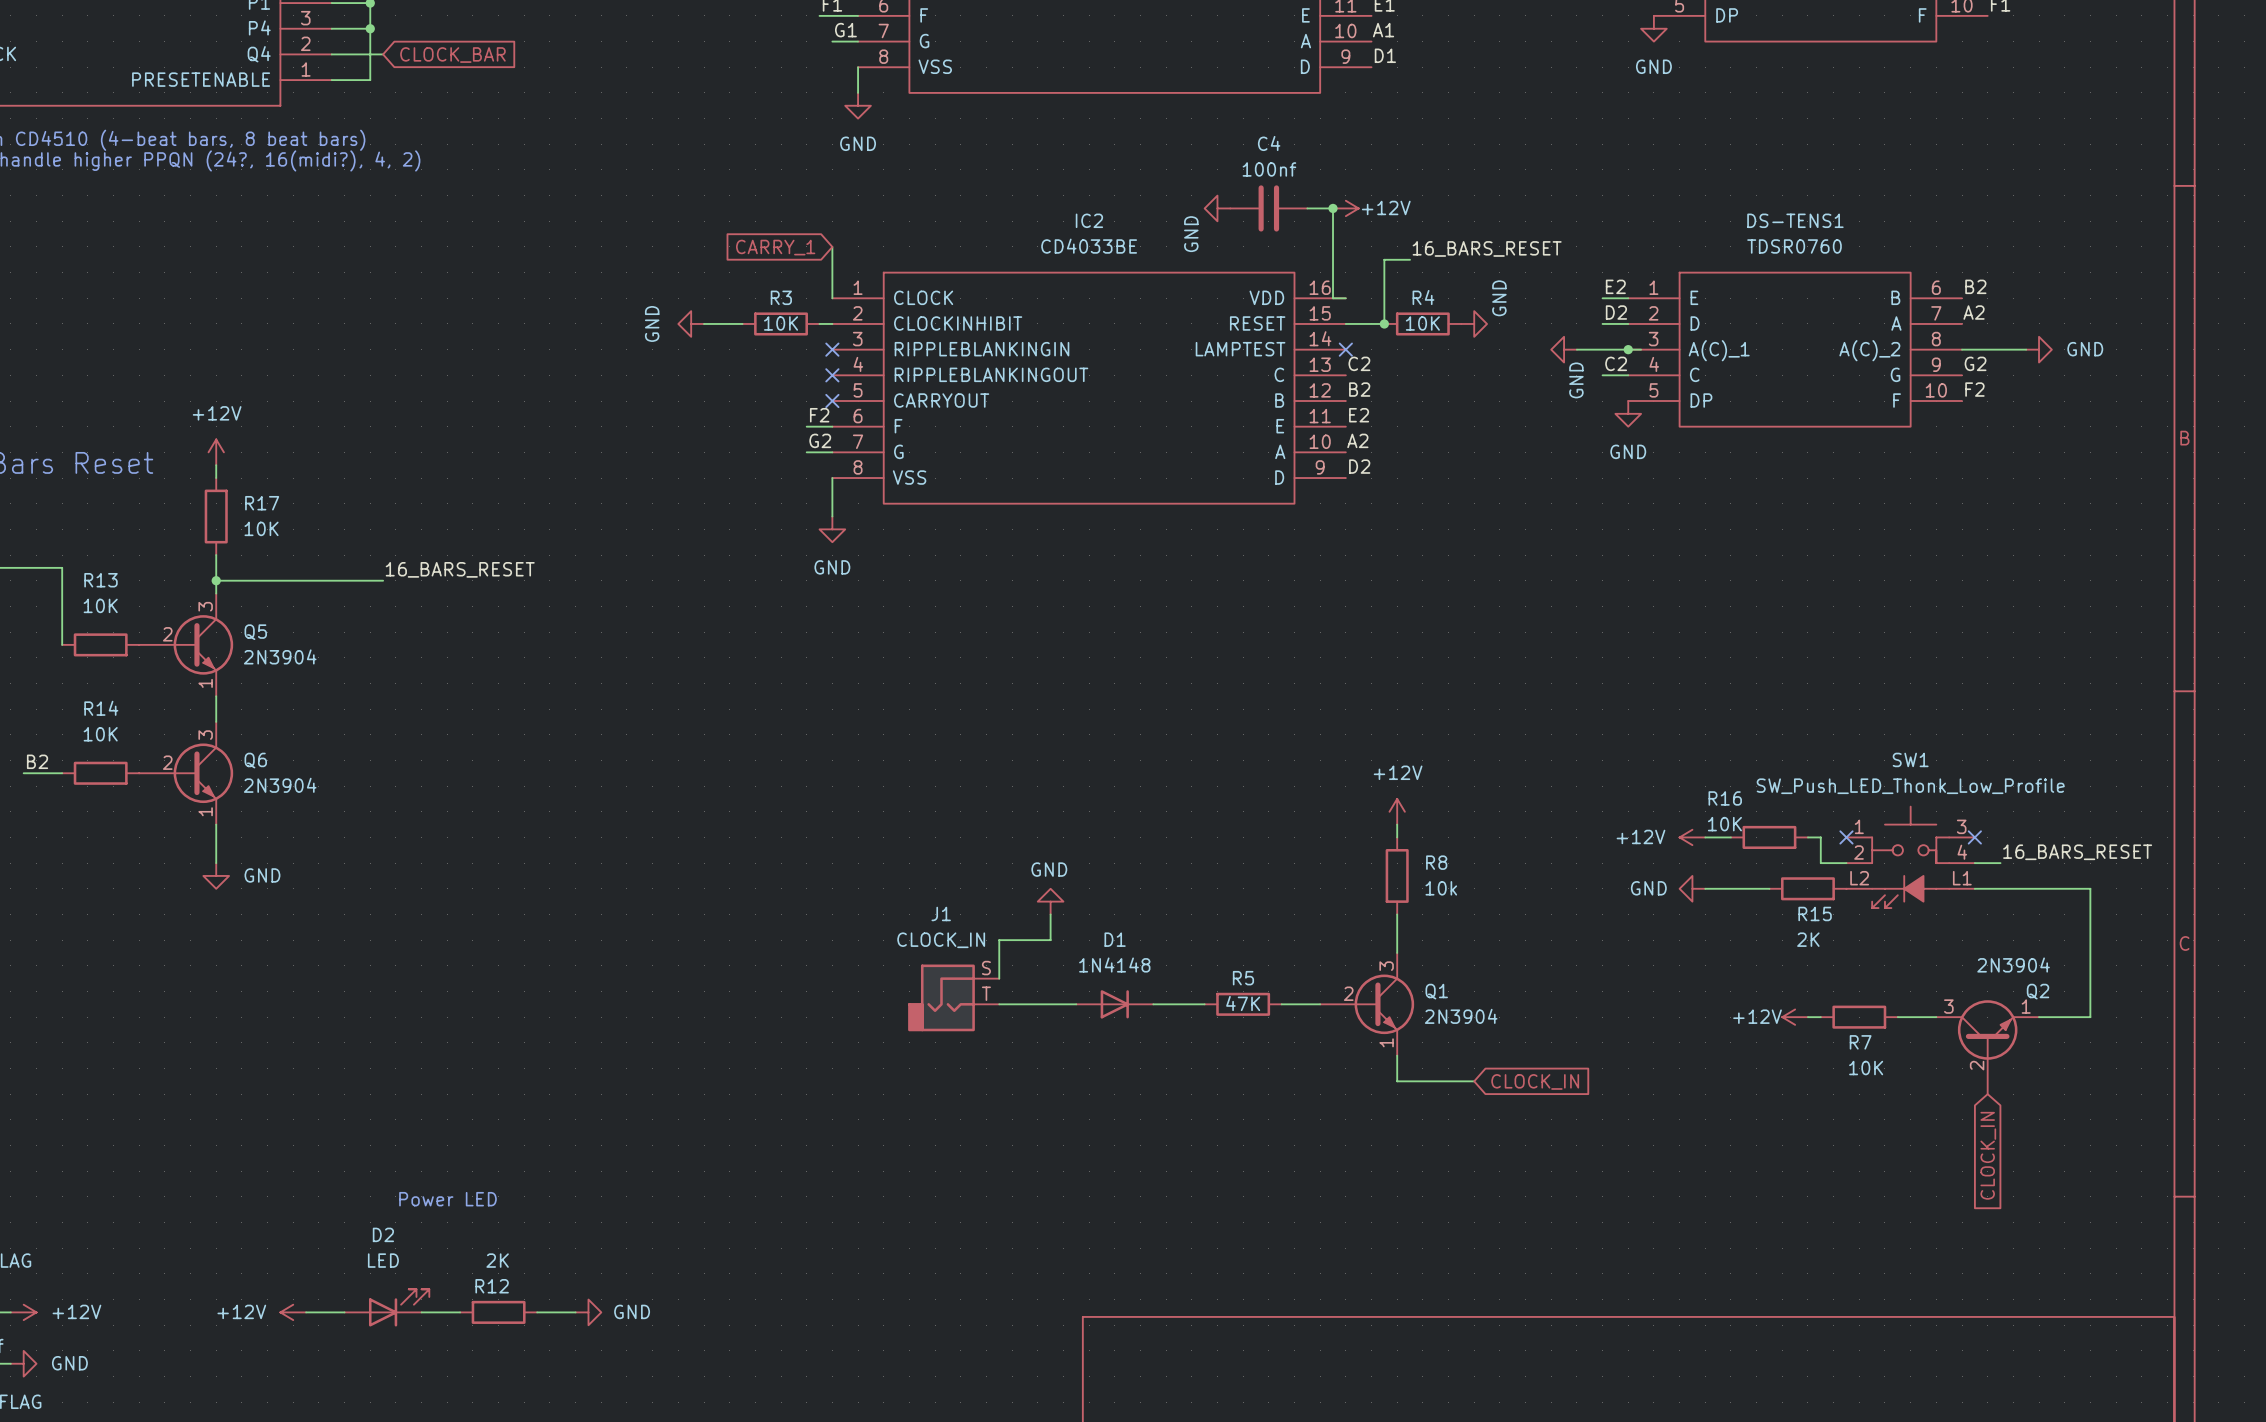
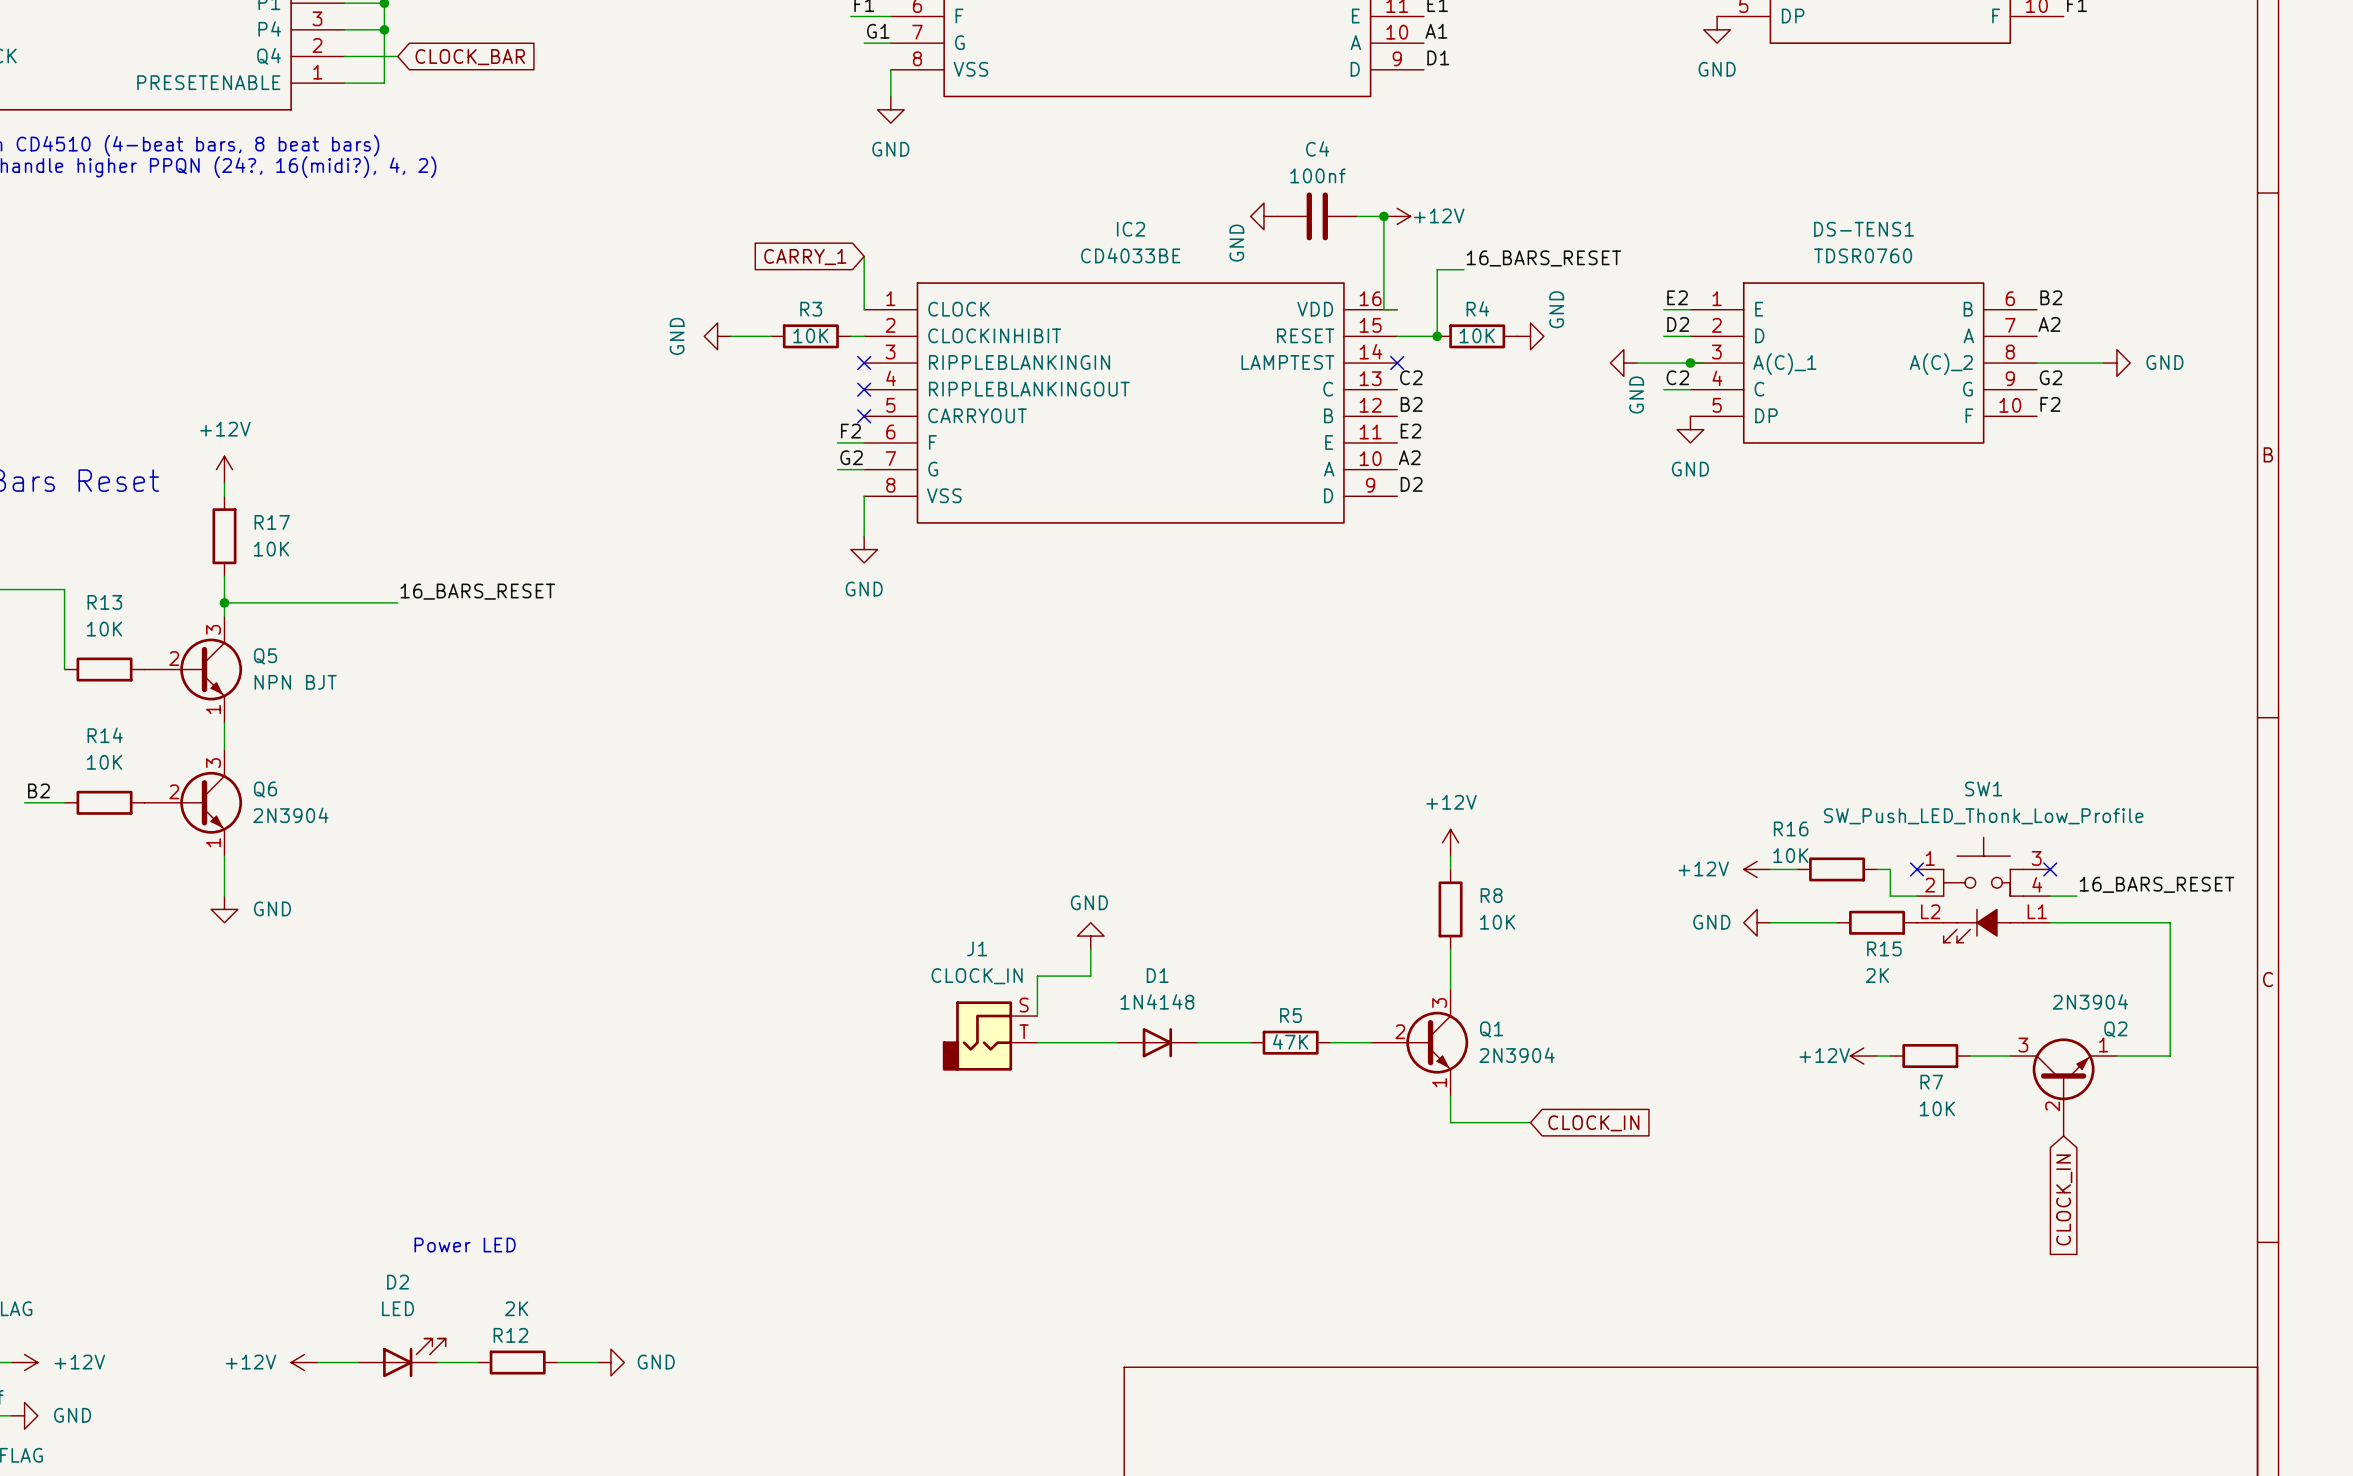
Q5 value: 2N3904 (280, 656) -> NPN BJT (295, 682)
R8 value: 10k (1441, 888) -> 10K (1497, 922)

